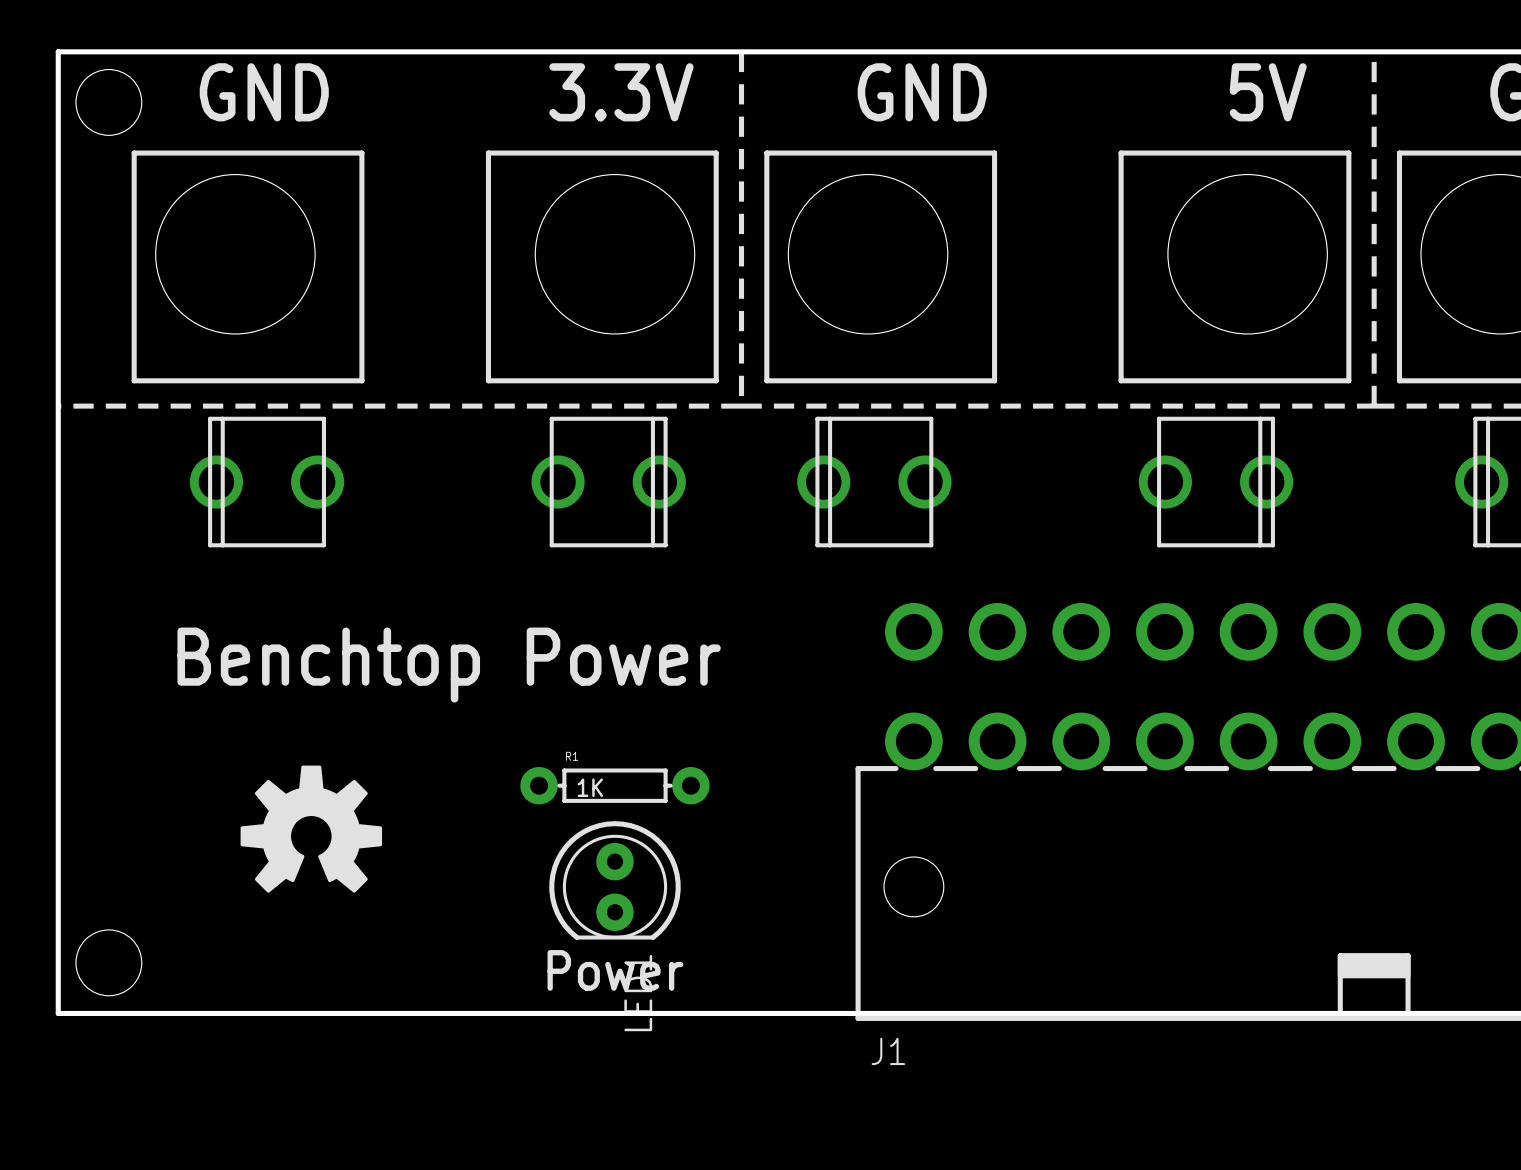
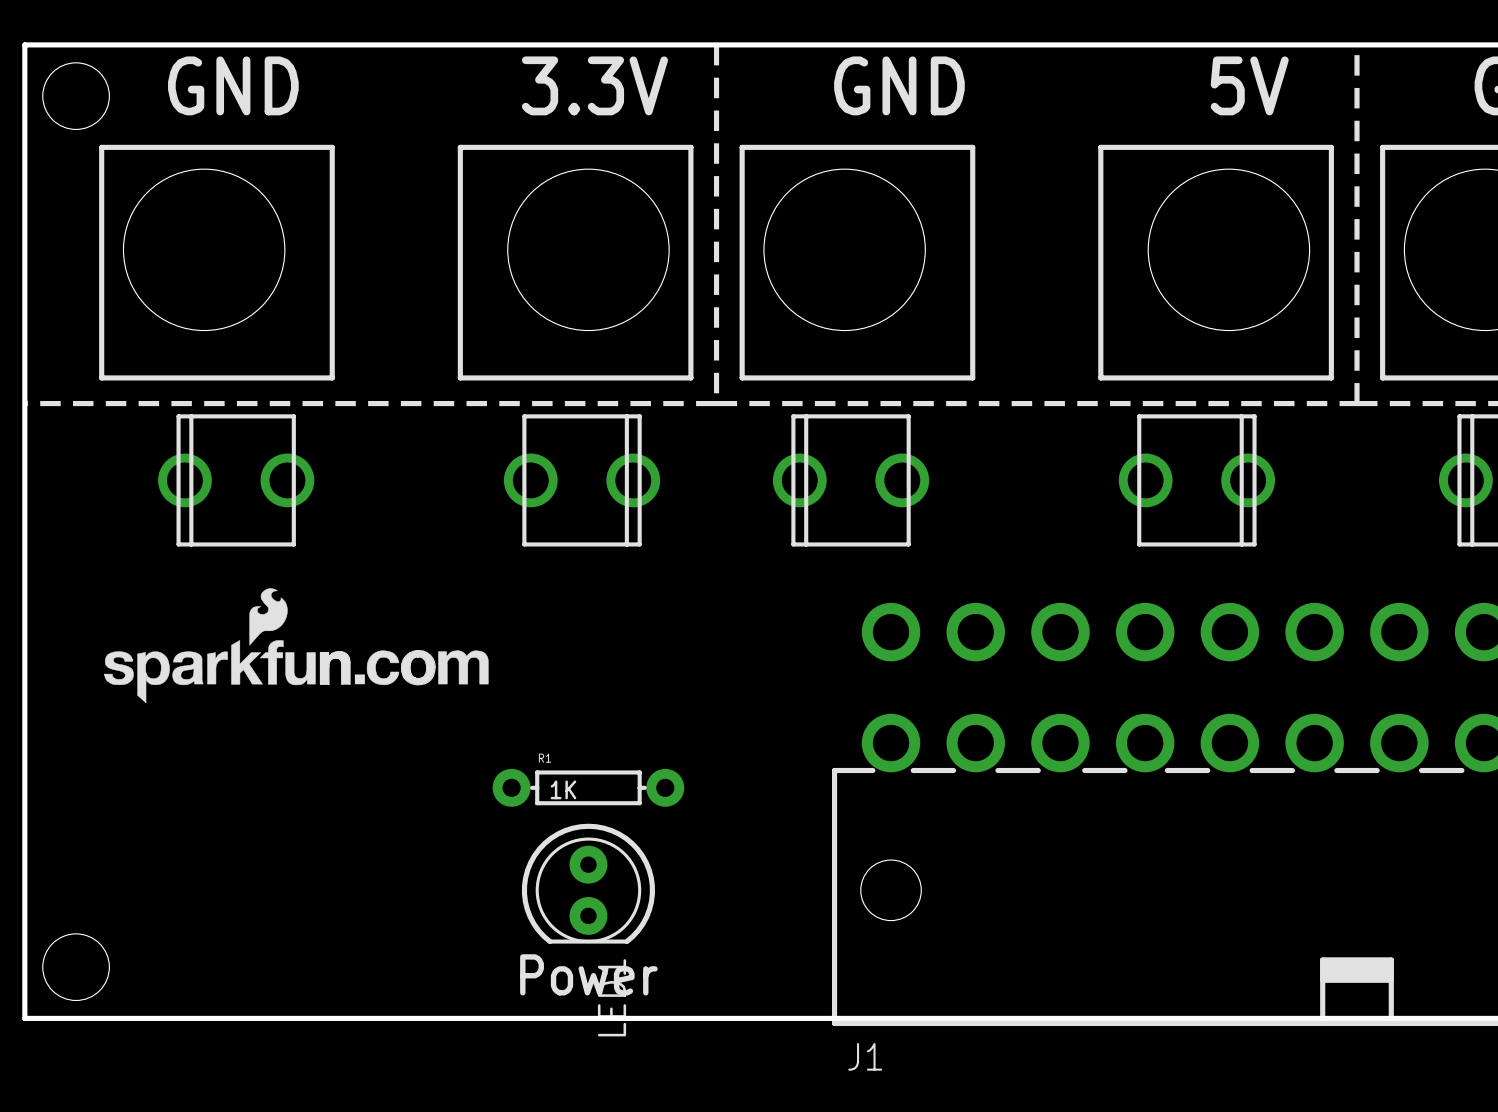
drawing: none -> [104, 588, 489, 704]
text: Benchtop Power (449, 665) -> none
drawing: [240, 765, 383, 893] -> none

